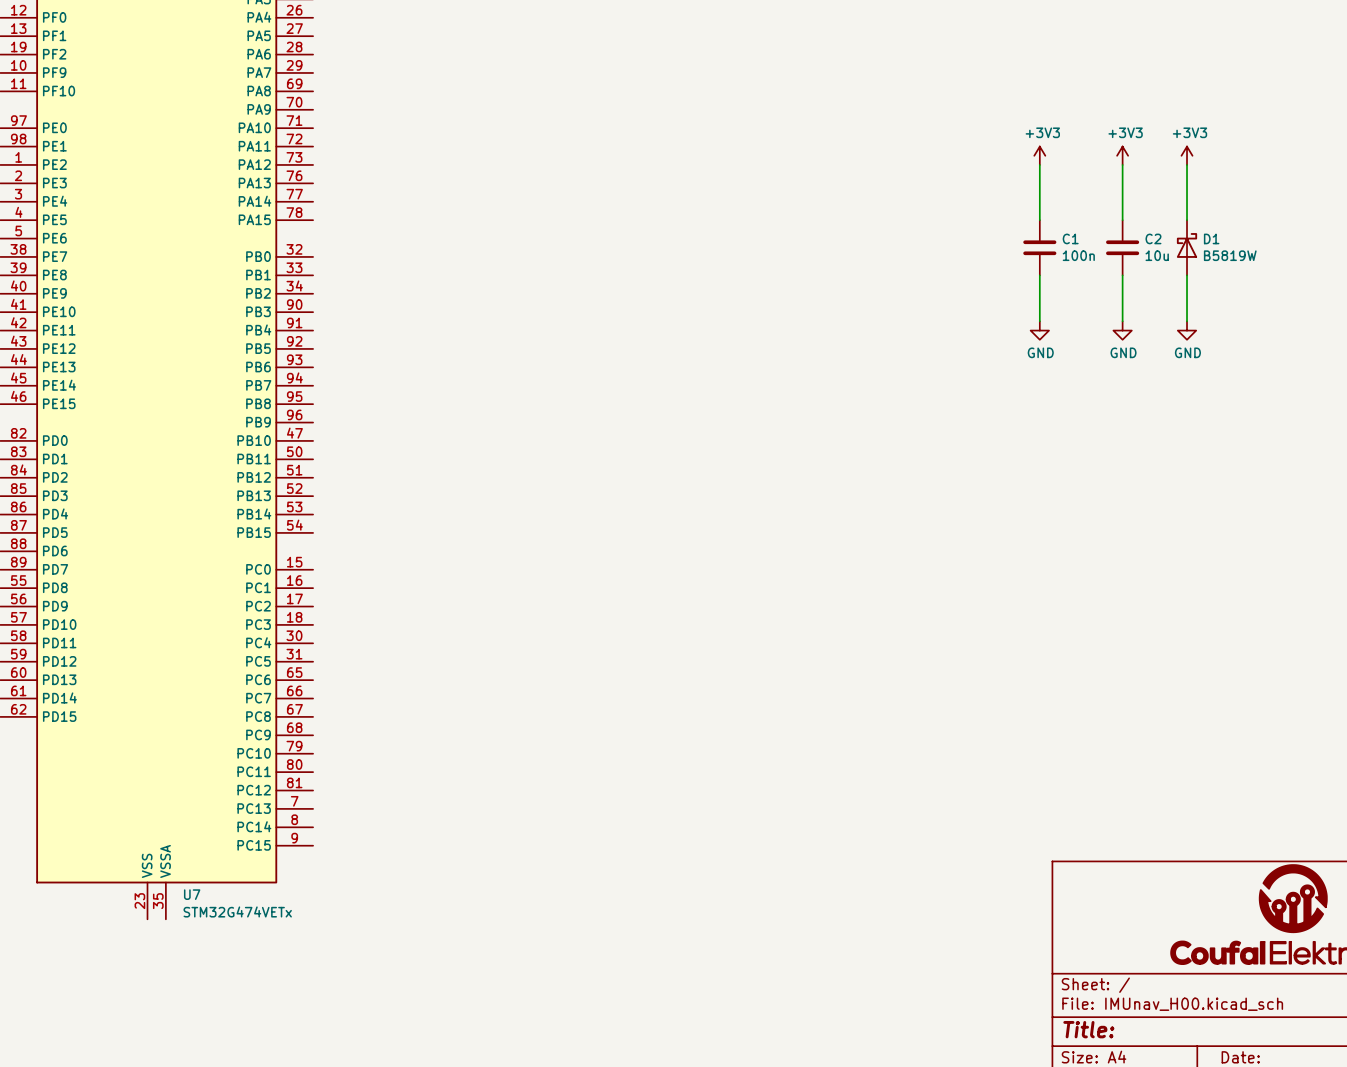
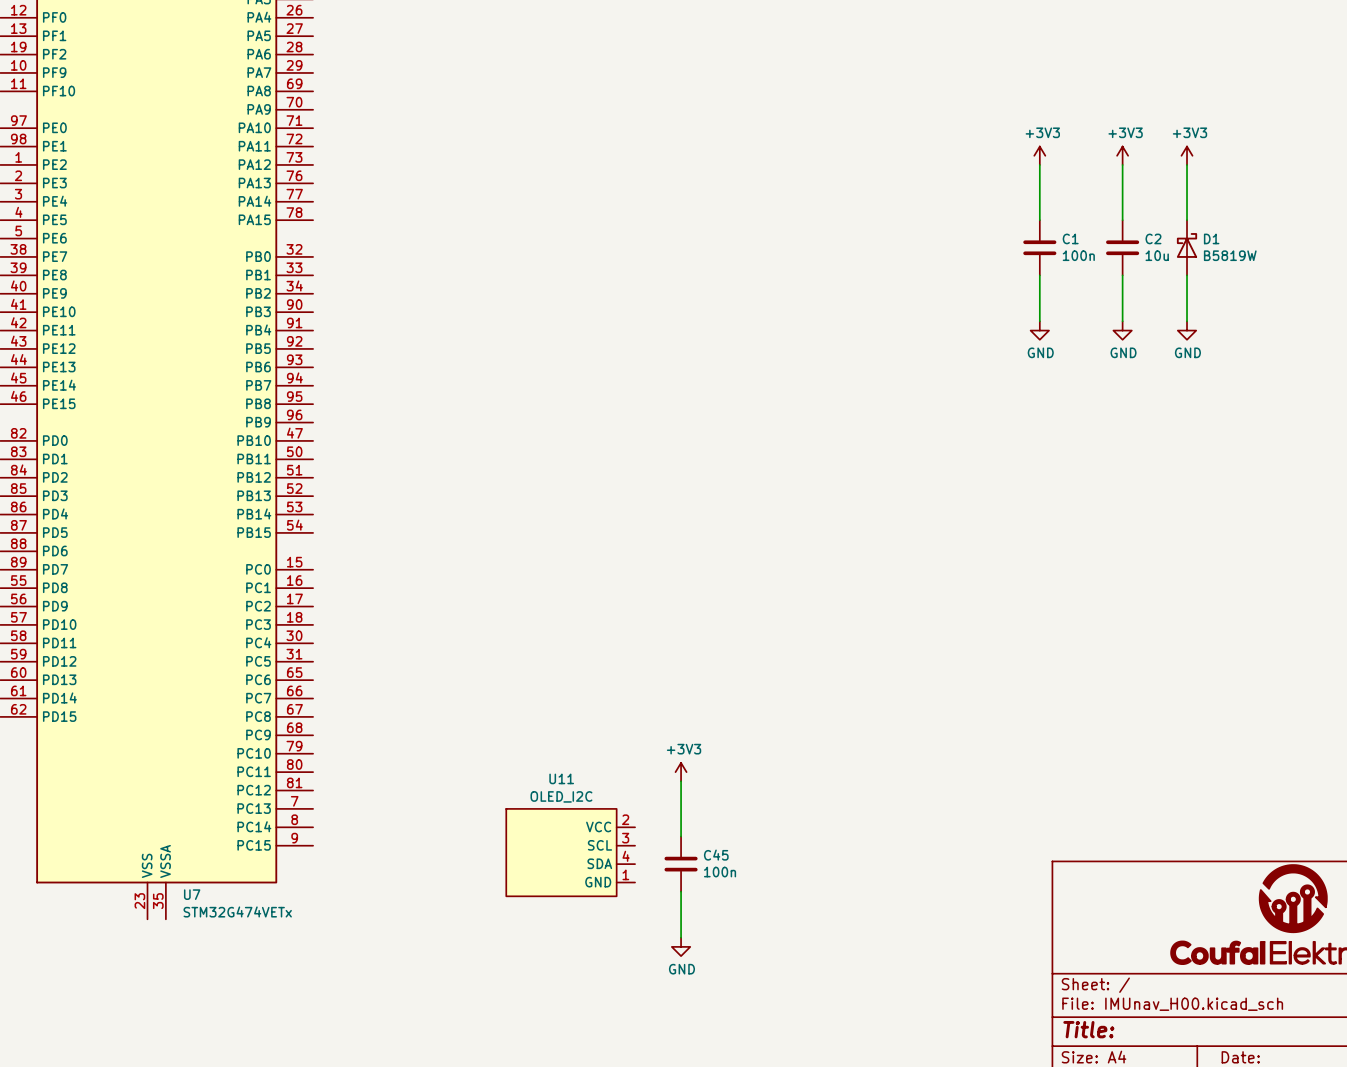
power symbol: none -> +3V3 (681, 772)
wire: none -> (681, 781) (681, 836)
U11: none -> OLED_I2C (570, 852)
C45: none -> 100n (681, 864)
wire: none -> (681, 891) (681, 937)
power symbol: none -> GND (681, 946)

